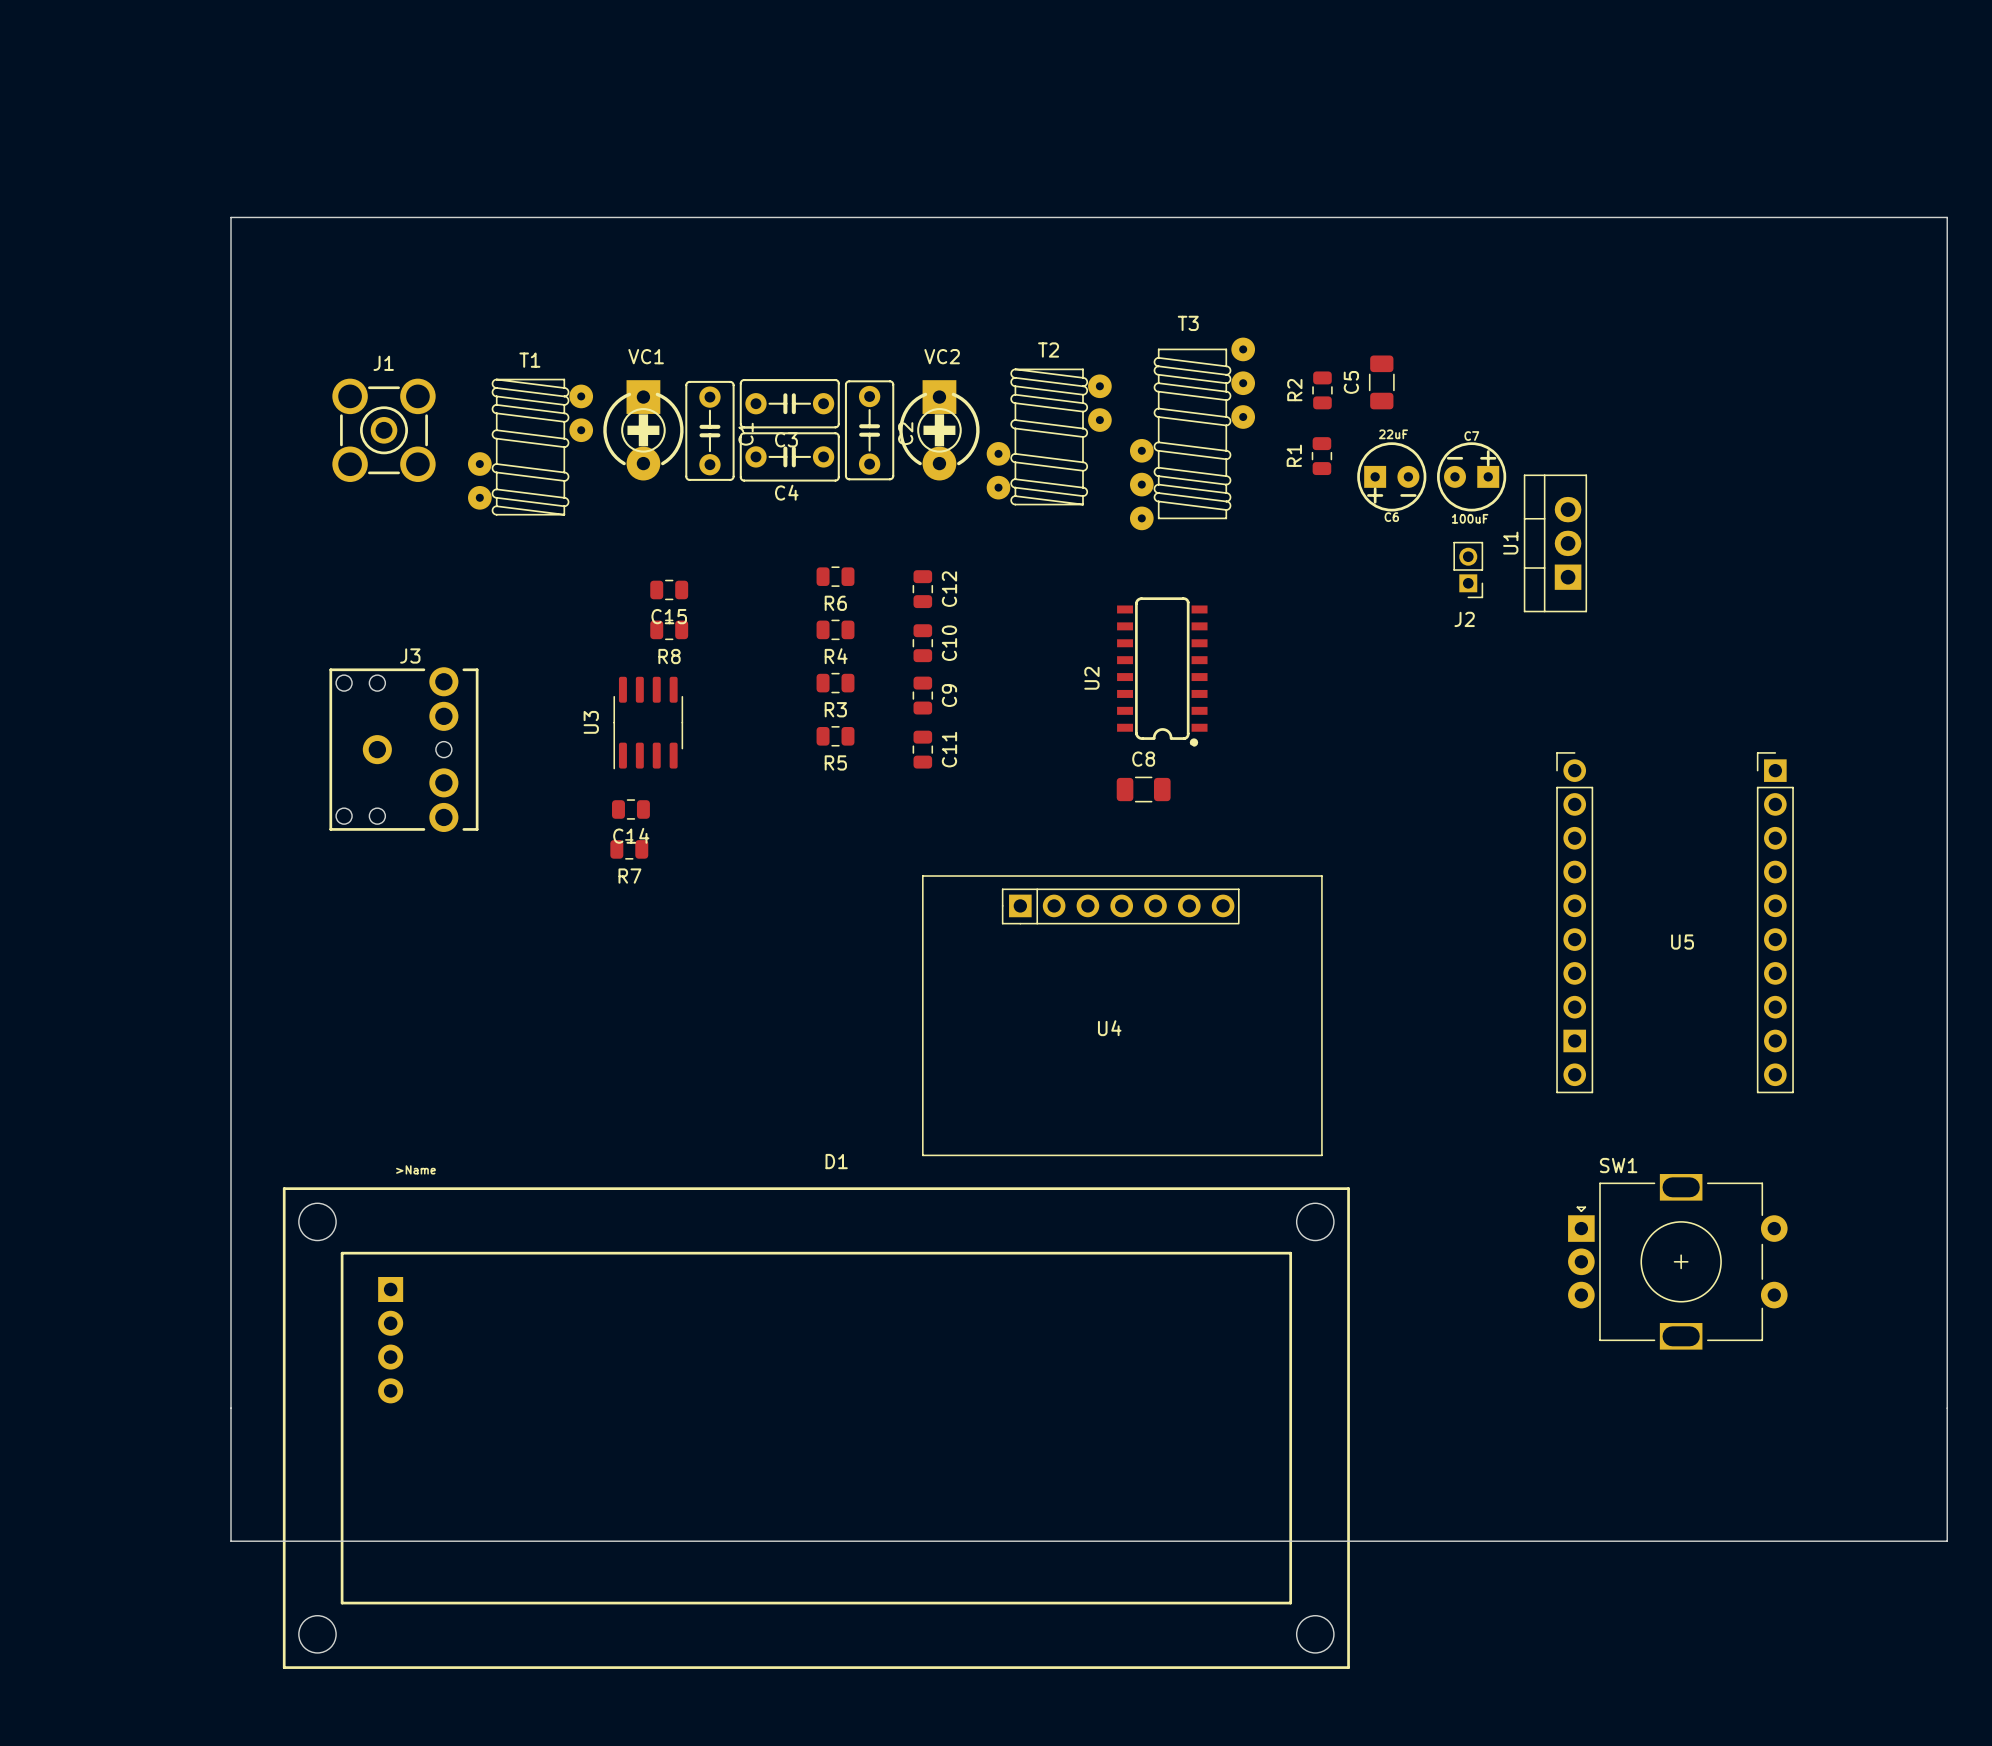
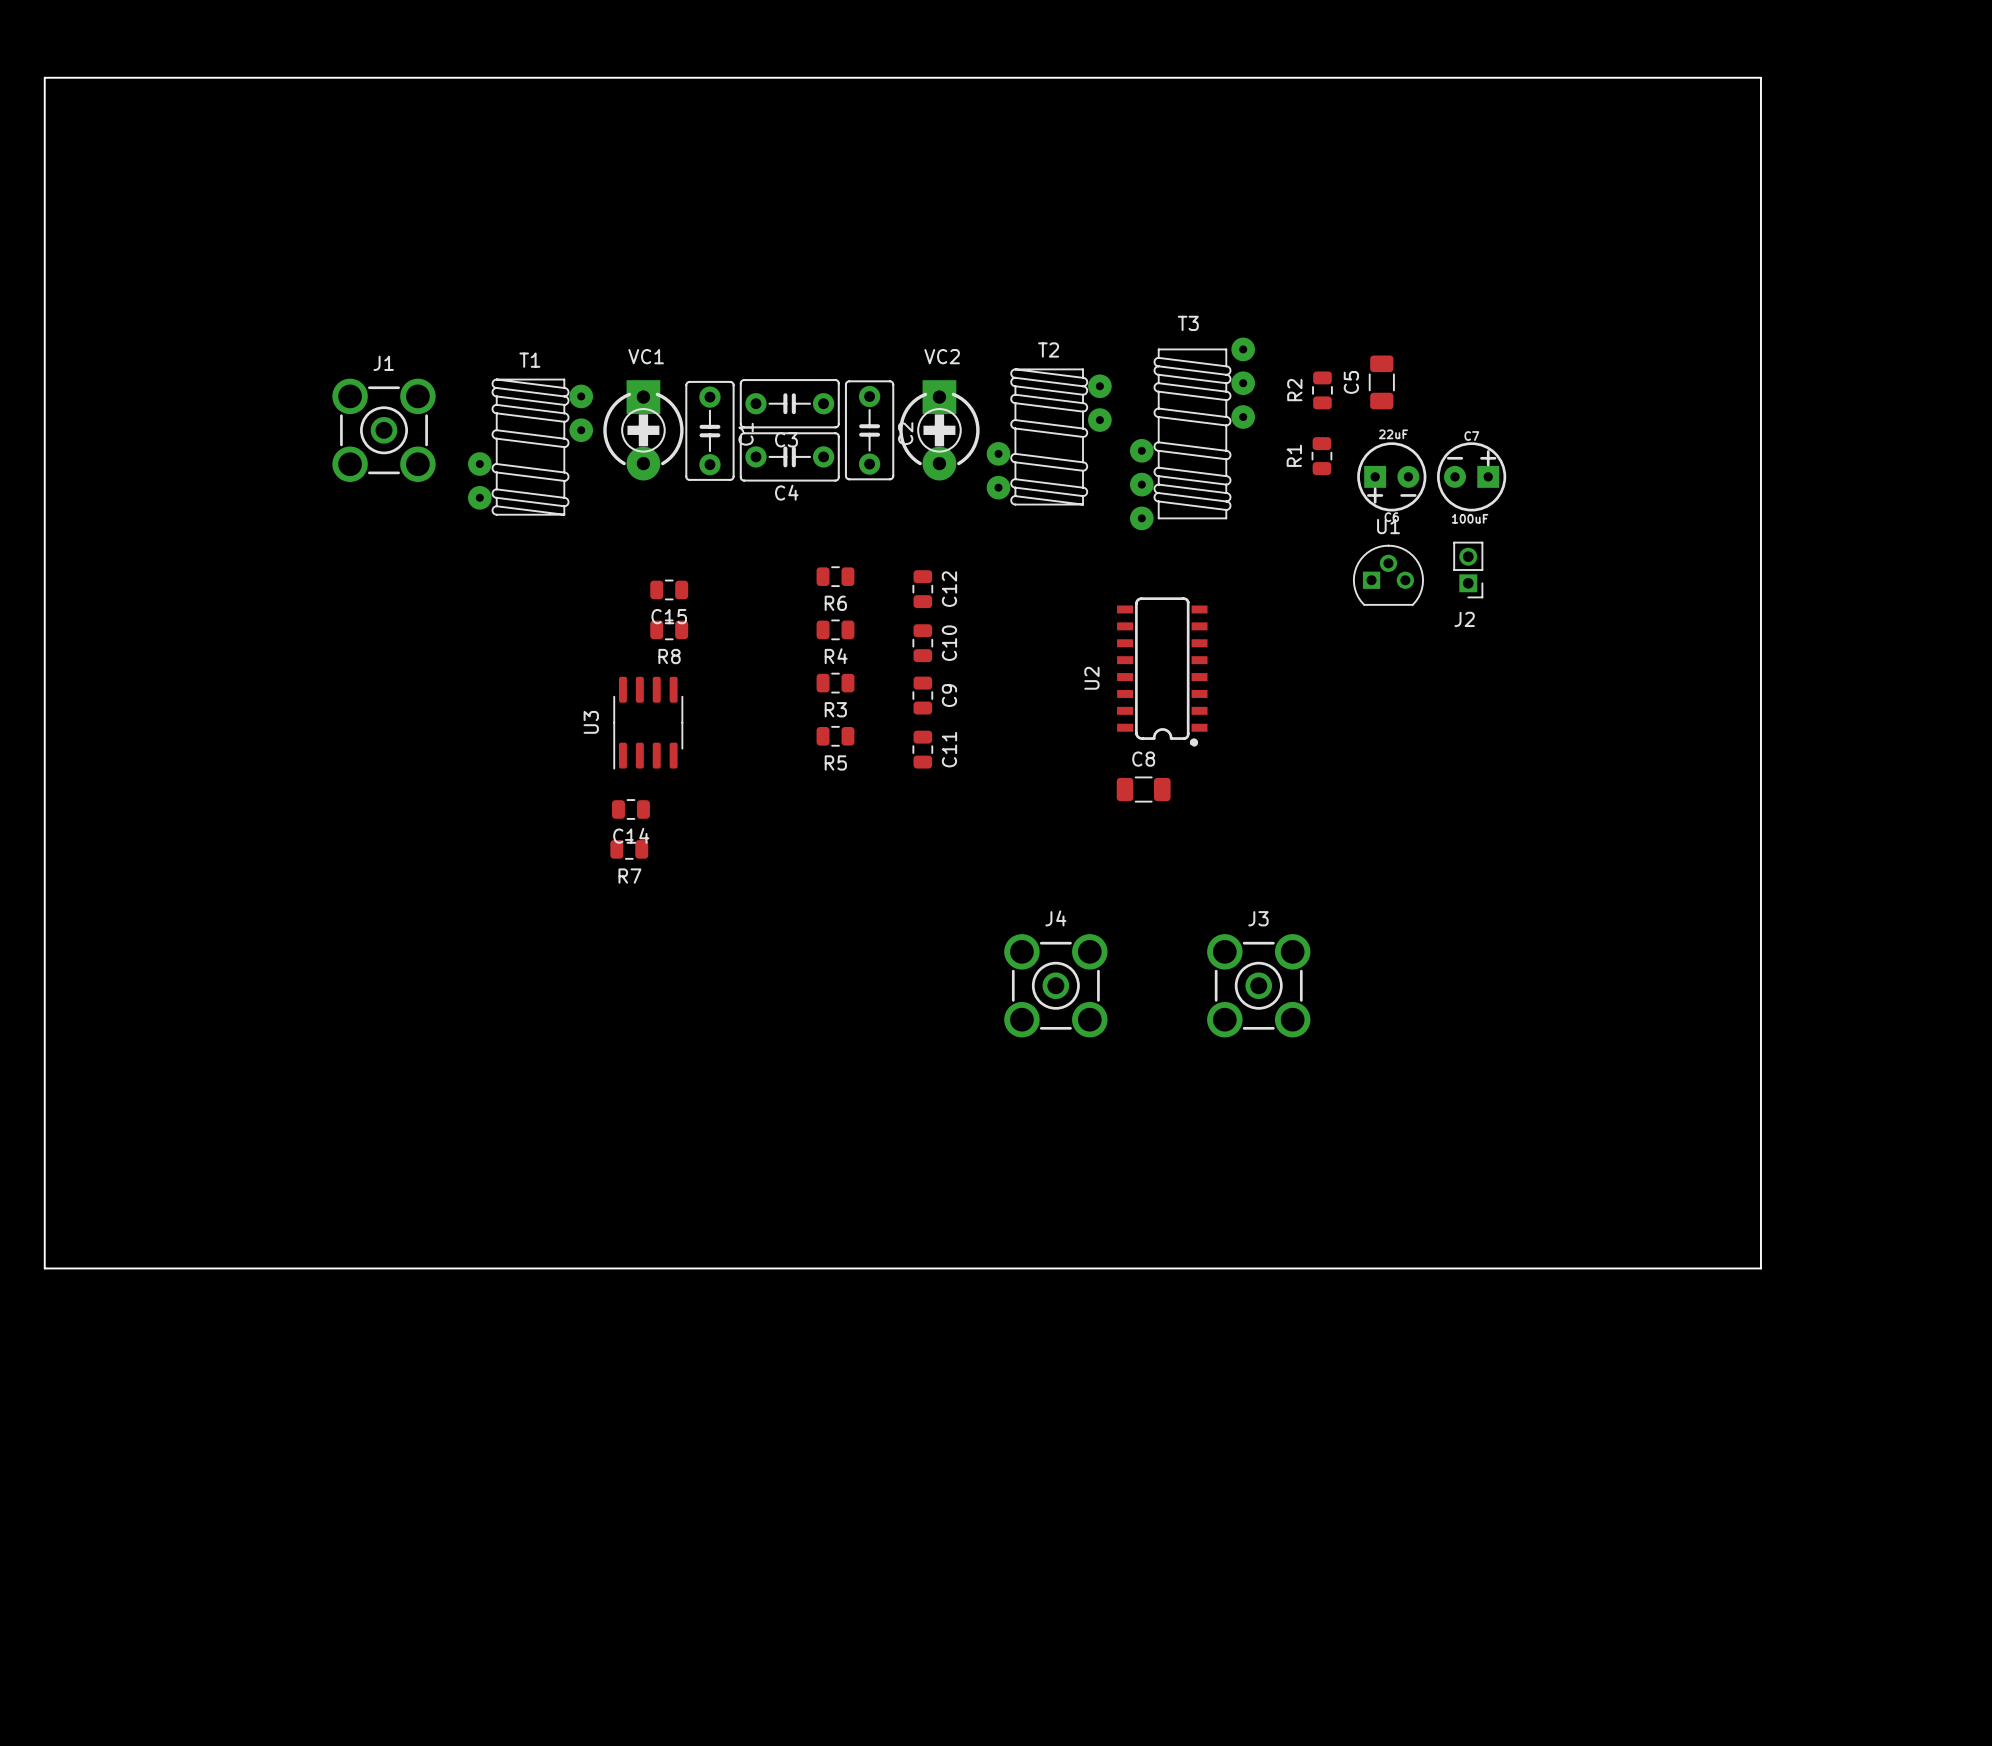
board edge: (231, 217) (1947, 217) (1947, 1541) (231, 1541) (231, 217) -> (44, 77) (44, 1268) (1760, 1268) (1760, 77) (44, 77)
U1 footprint: [1523, 474, 1588, 613] -> [1353, 544, 1424, 606]
U1 name position: U1 (1510, 543) -> U1 (1388, 526)
J3 name position: J3 (410, 655) -> J3 (1258, 918)
J3 footprint: [329, 667, 479, 832] -> [1207, 934, 1311, 1038]
U5: (1675, 922) -> none
J4: none -> (1055, 985)
U4: (1122, 1015) -> none
SW1: (1677, 1261) -> none
D1: (816, 1428) -> none

